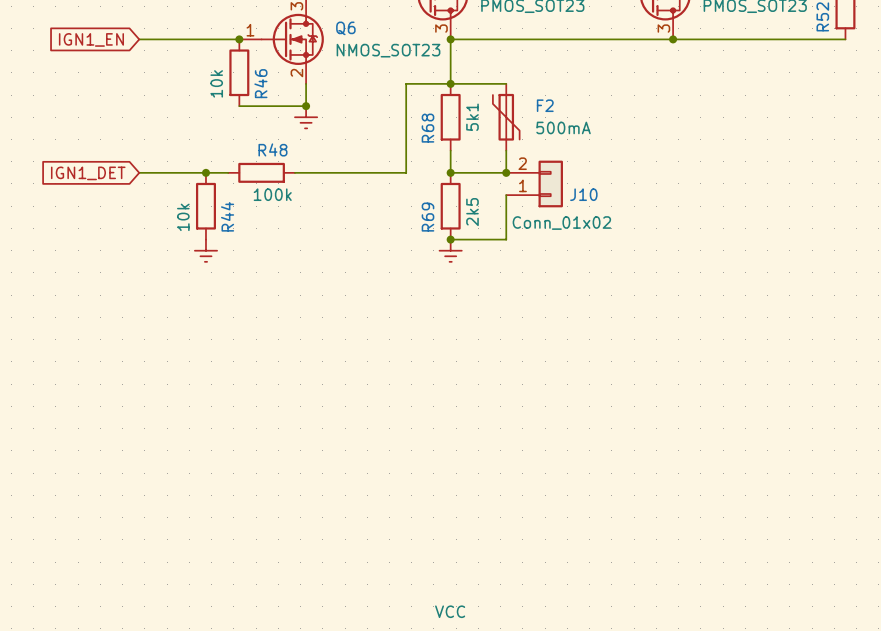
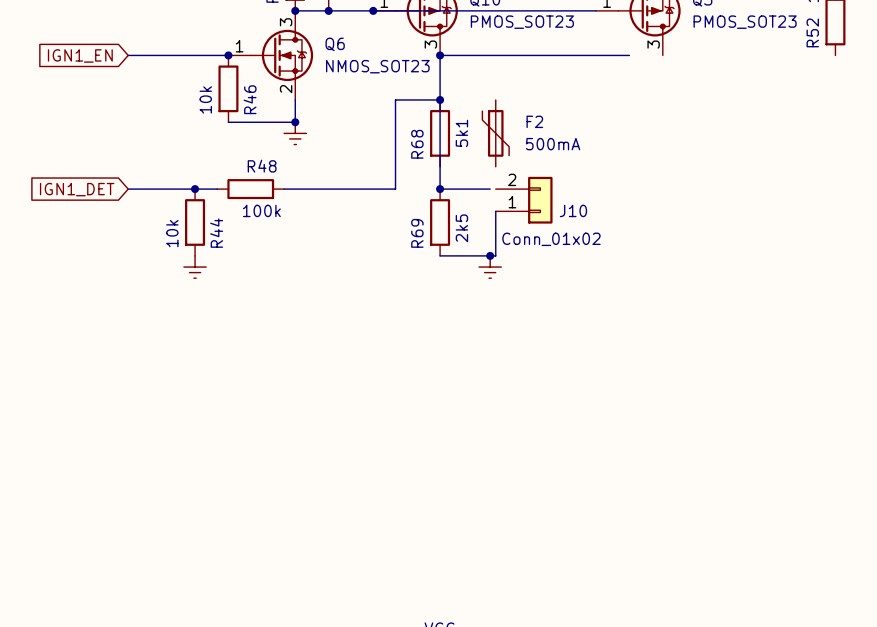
wire: (639, 39) (845, 39) -> none
junction: (673, 39) -> none
wire: (450, 83) (506, 83) -> (440, 99) (440, 166)
wire: (506, 150) (506, 172) (500, 172) -> none
junction: (506, 172) -> none
junction: (450, 239) -> none
junction: none -> (490, 255)
power symbol position: (450, 250) -> (490, 267)

